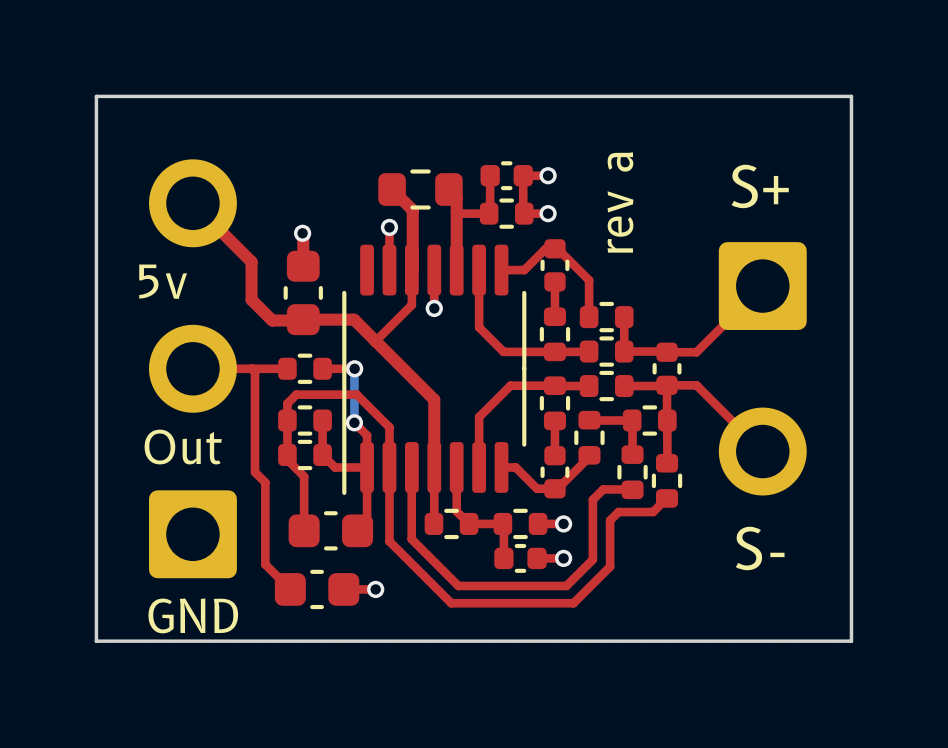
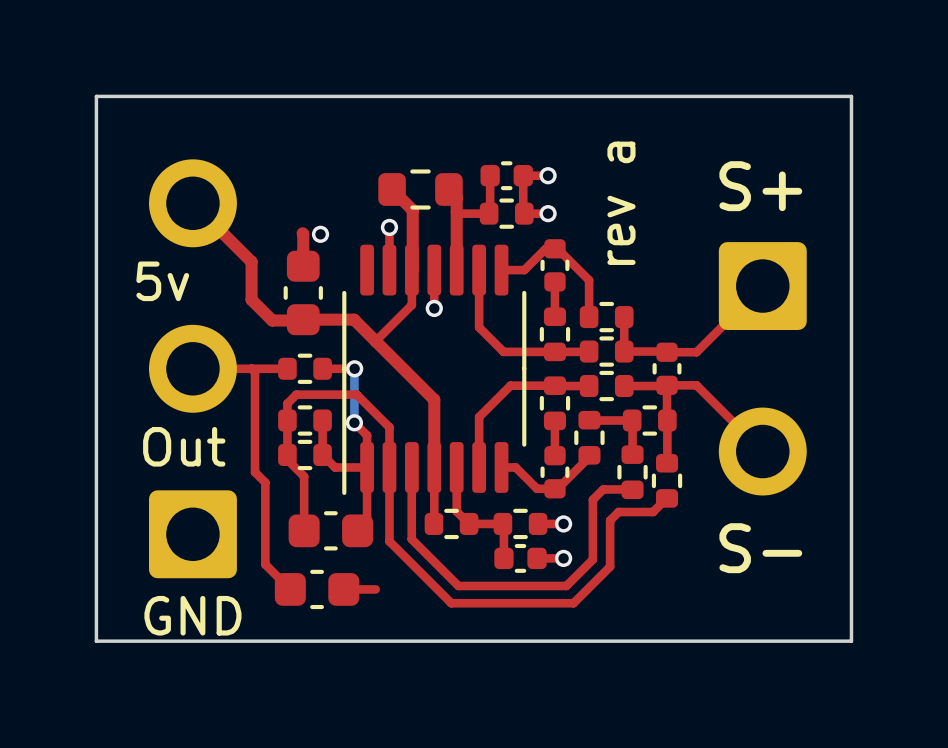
via position: (302, 233) -> (320, 234)
via: (375, 589) -> none

